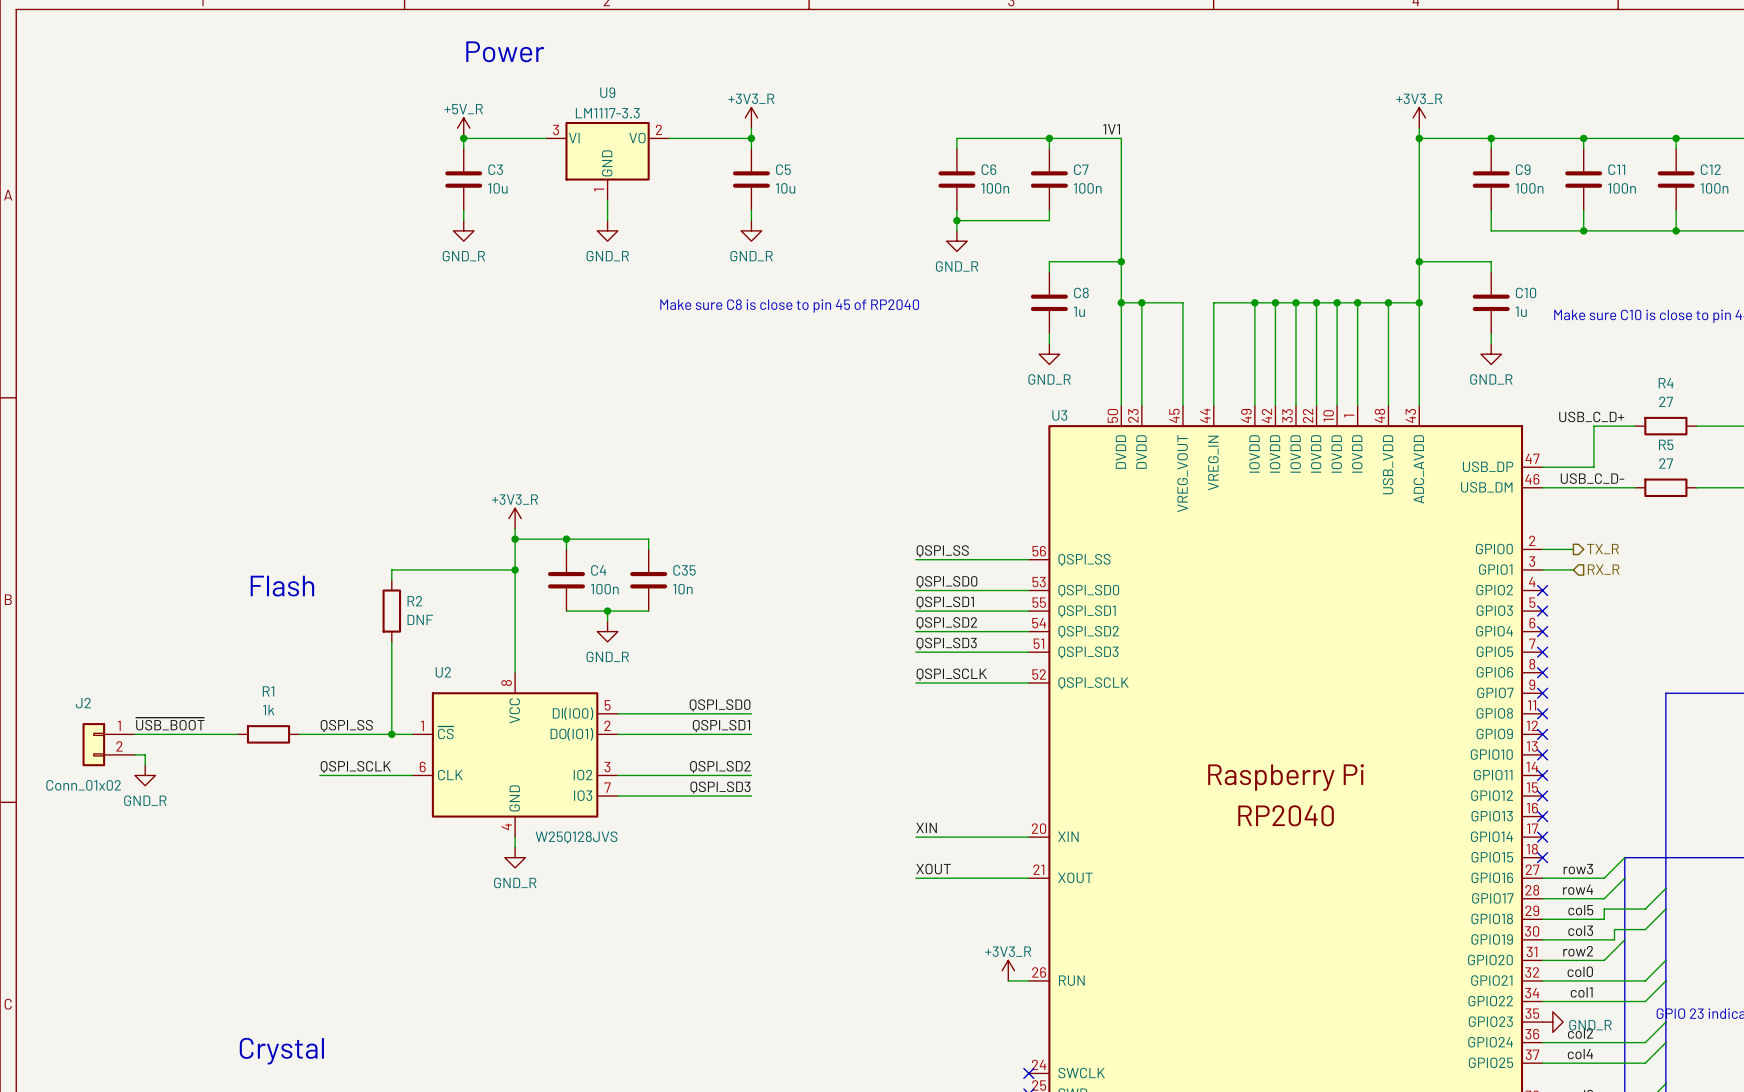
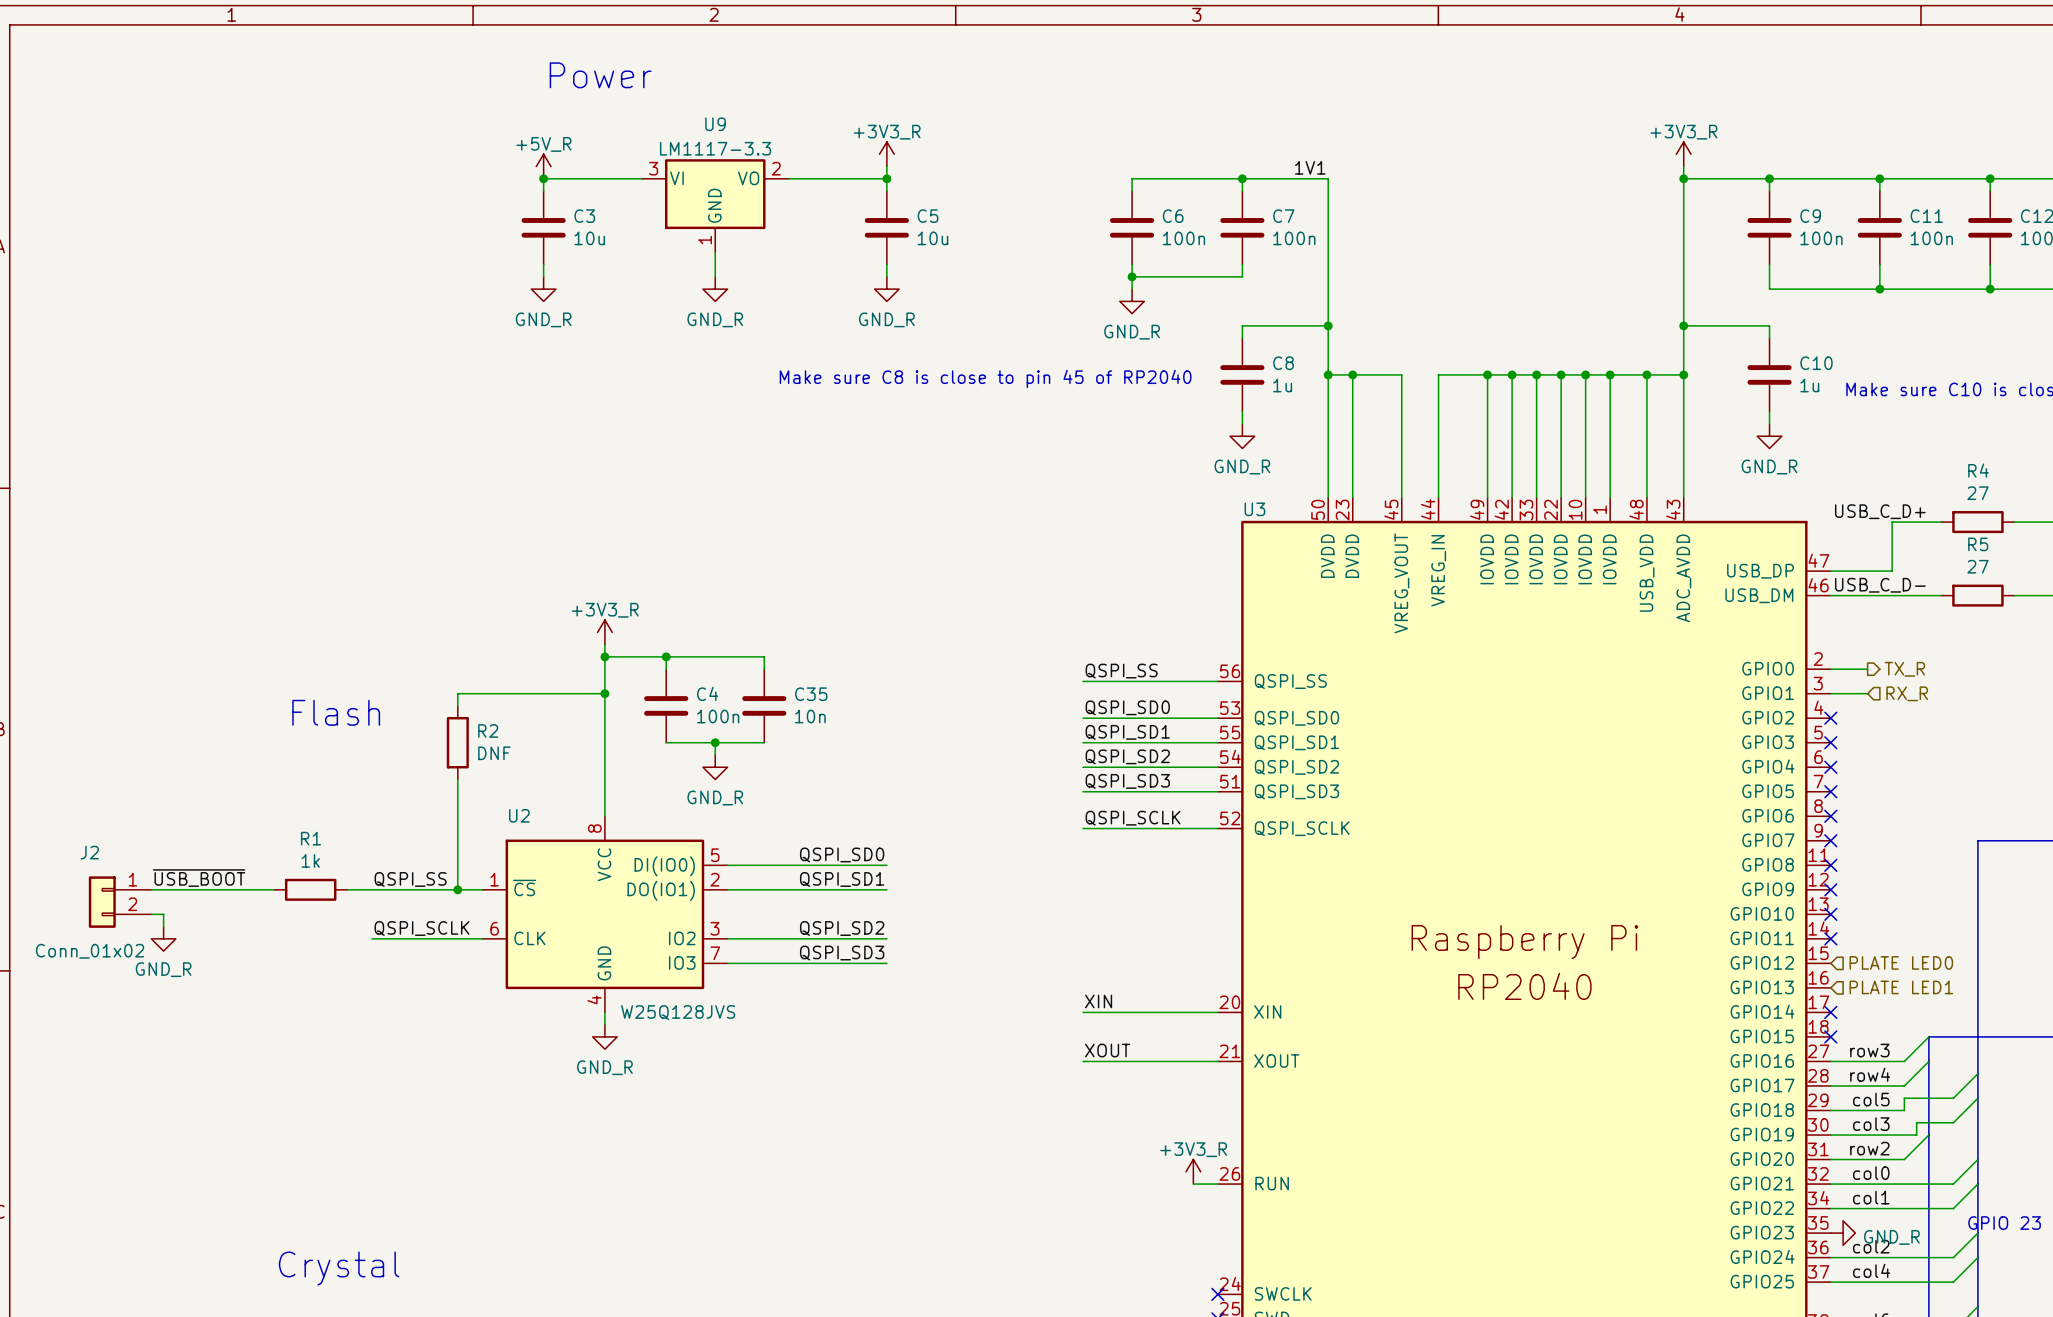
hierarchical label: none -> PLATE LED0 (1901, 962)
no-connect mark: (1542, 796) -> none
no-connect mark: (1542, 816) -> none
hierarchical label: none -> PLATE LED1 (1901, 987)

